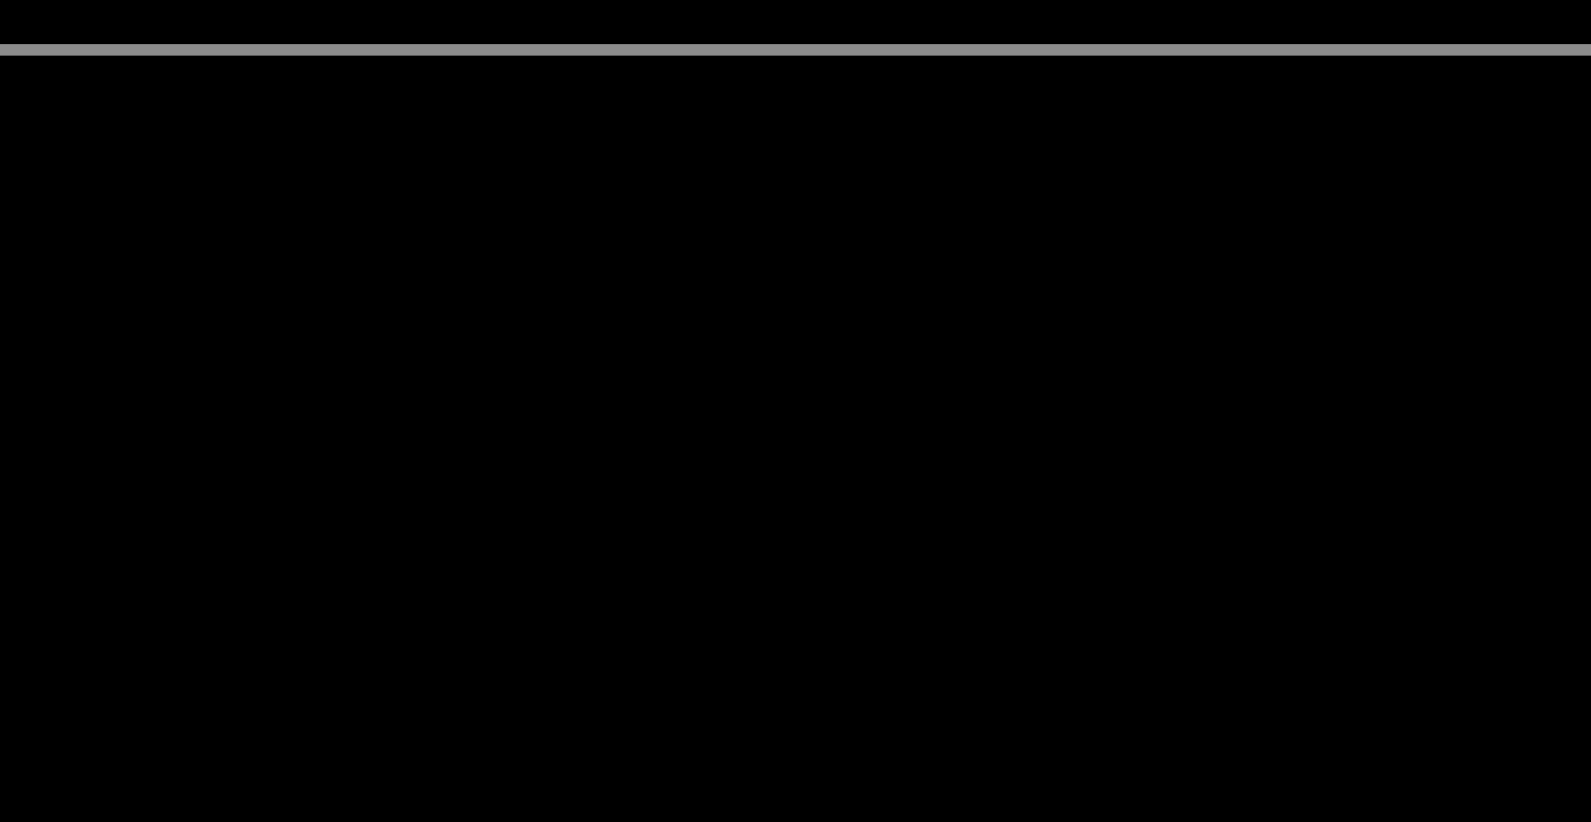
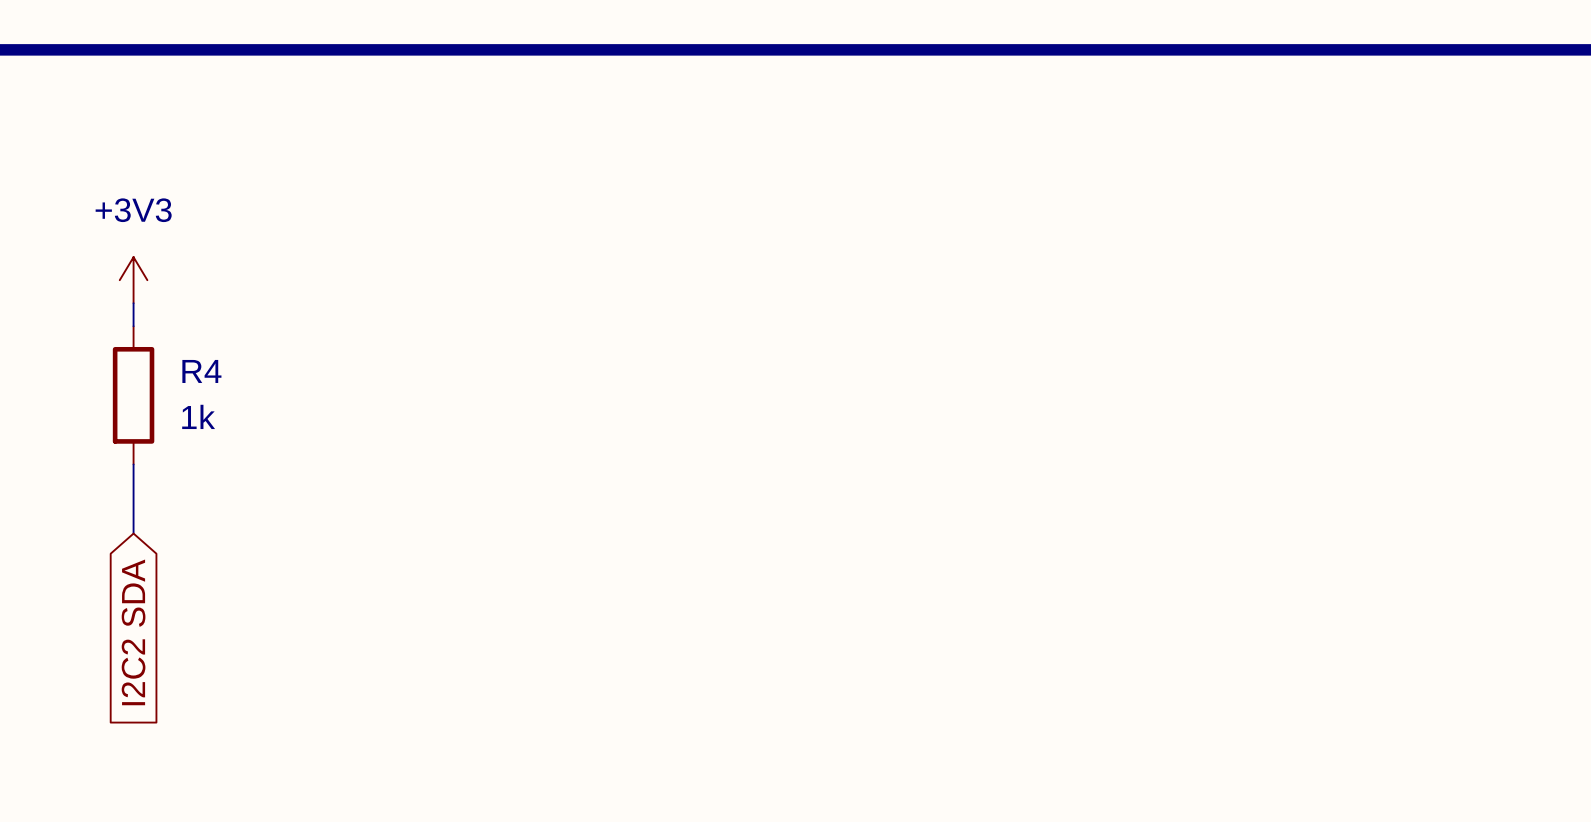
power symbol: none -> +3V3 (133, 280)
wire: none -> (133, 303) (133, 326)
R4: none -> 1k (133, 395)
wire: none -> (133, 464) (133, 533)
global label: none -> I2C2 SDA (133, 632)

